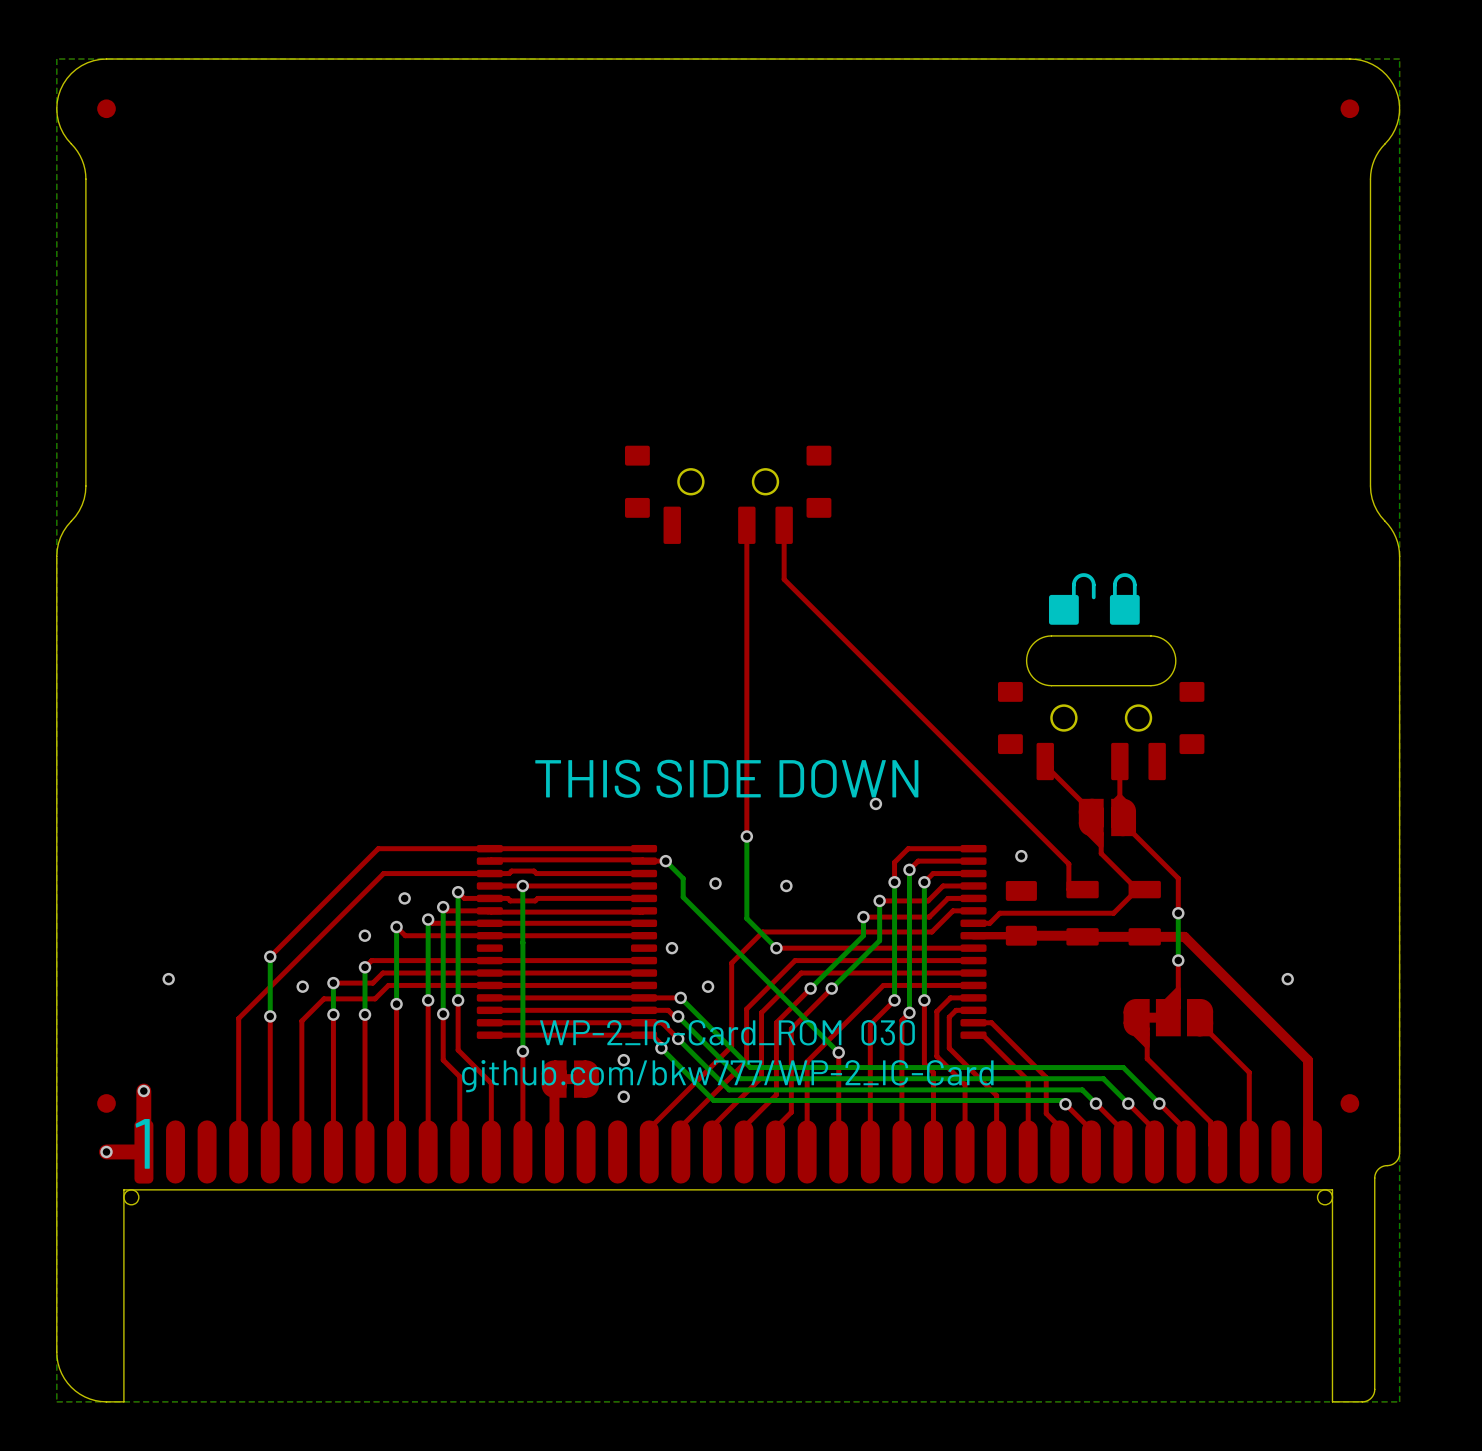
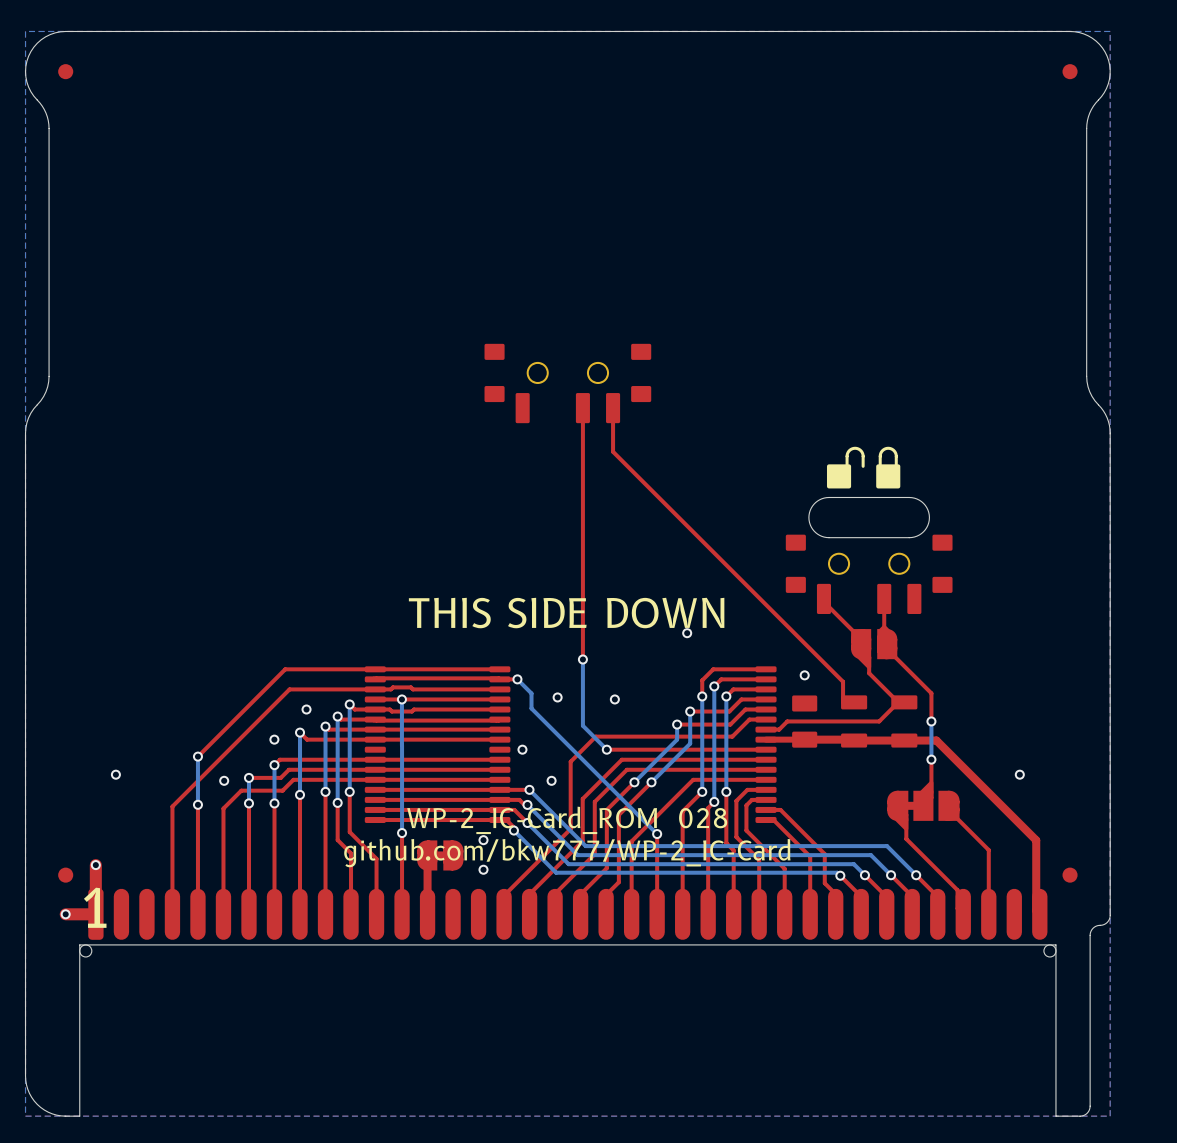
text: WP-2_IC-Card_ROM 030 (727, 1032) -> WP-2_IC-Card_ROM 028 (567, 820)

